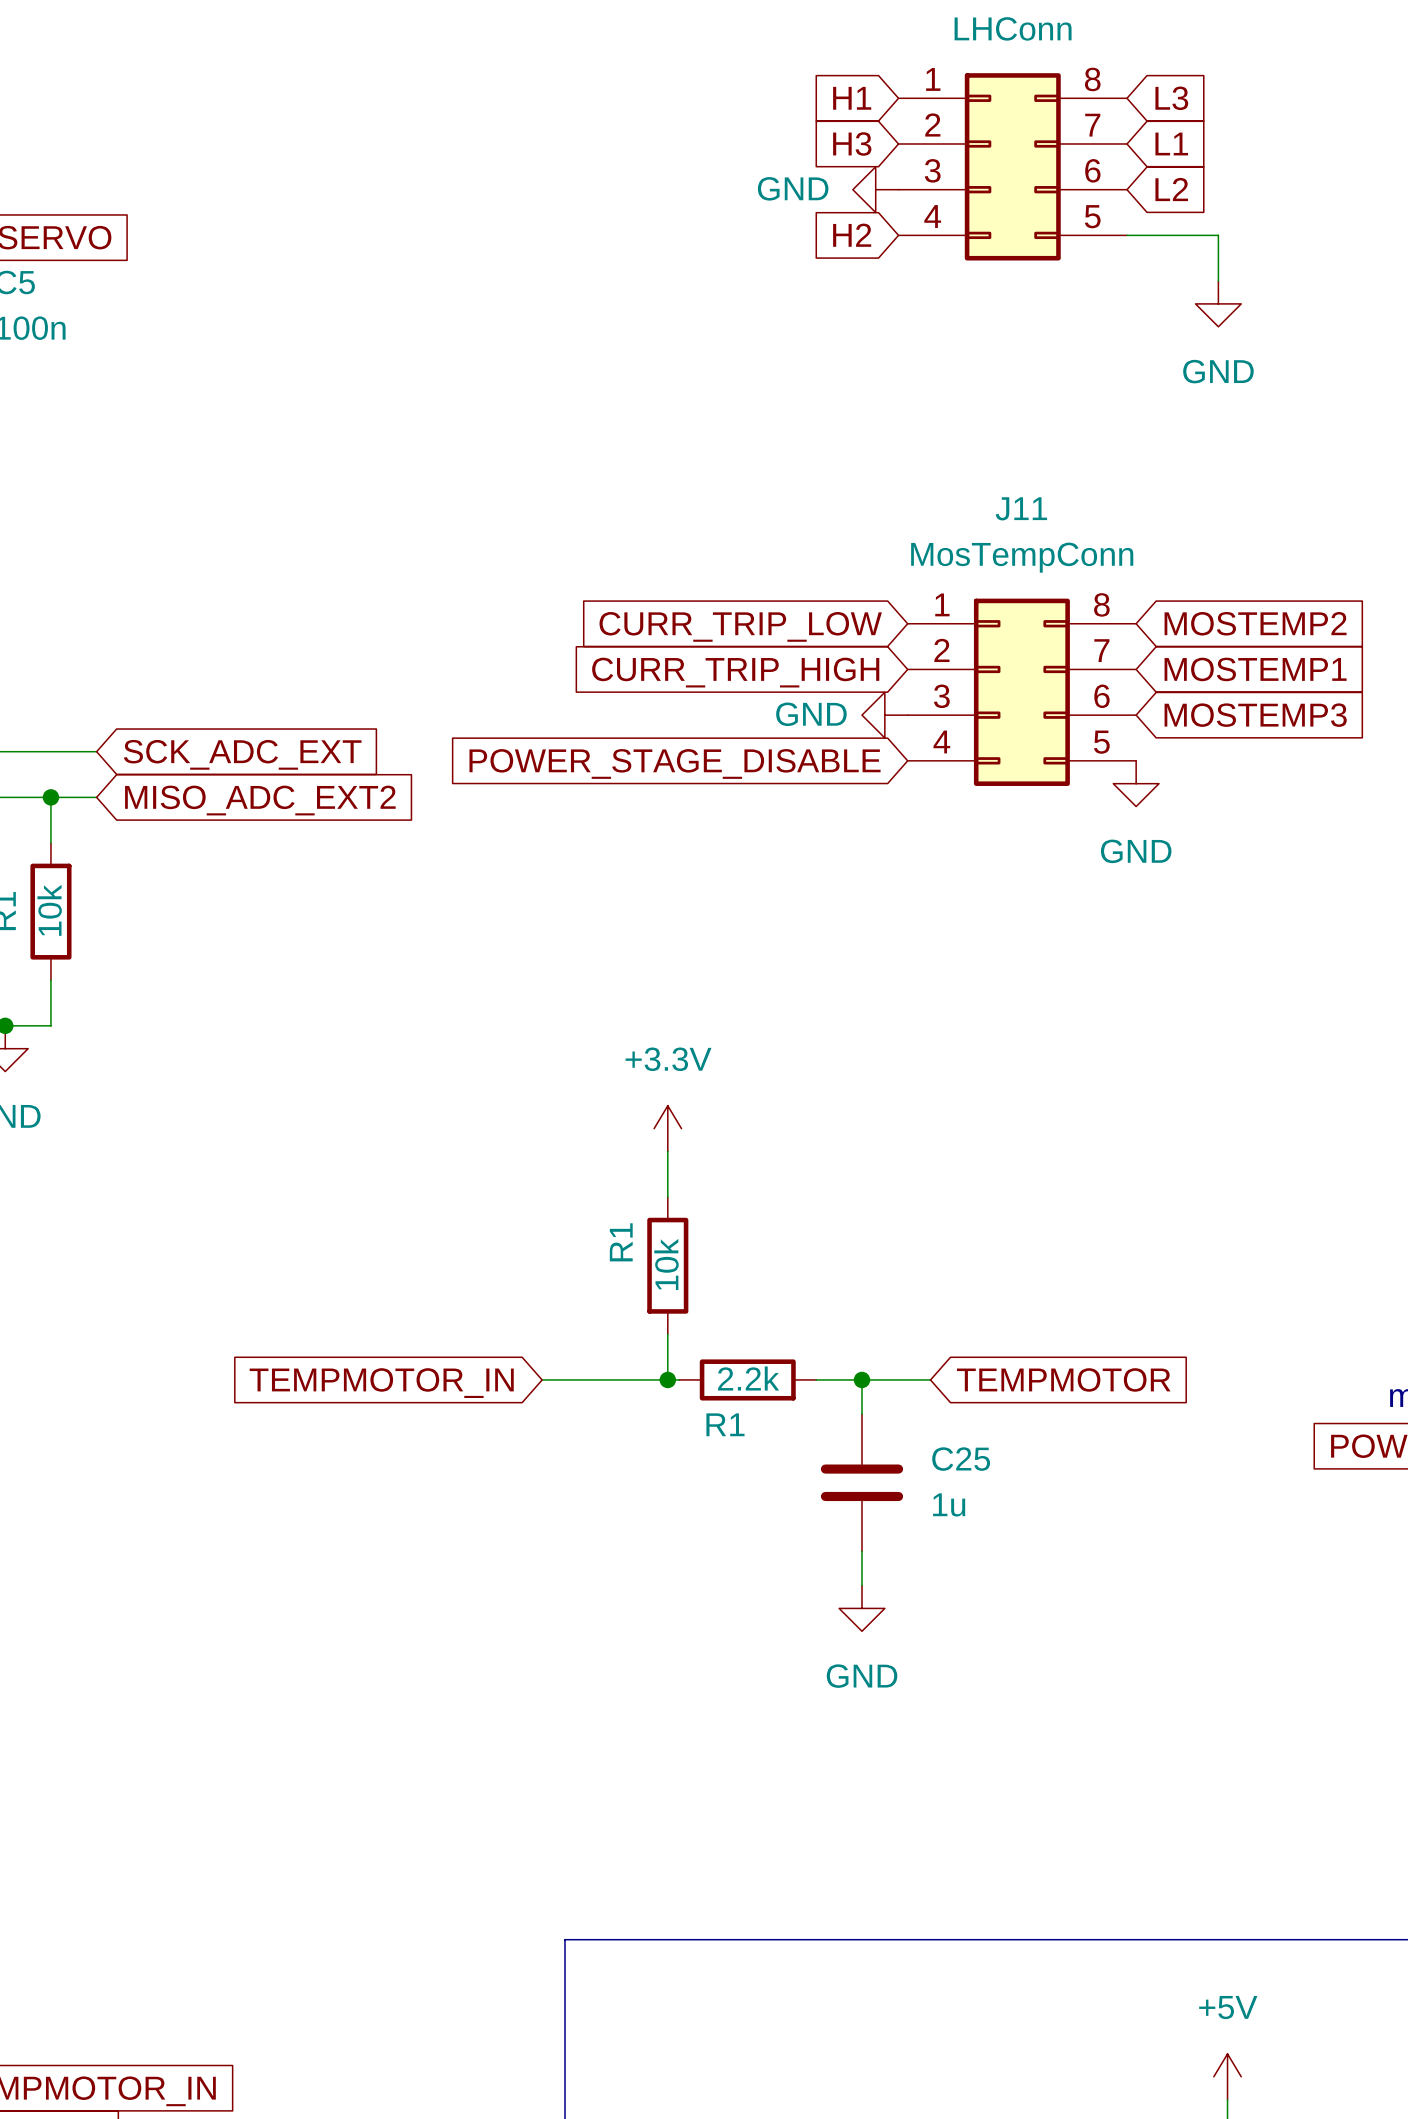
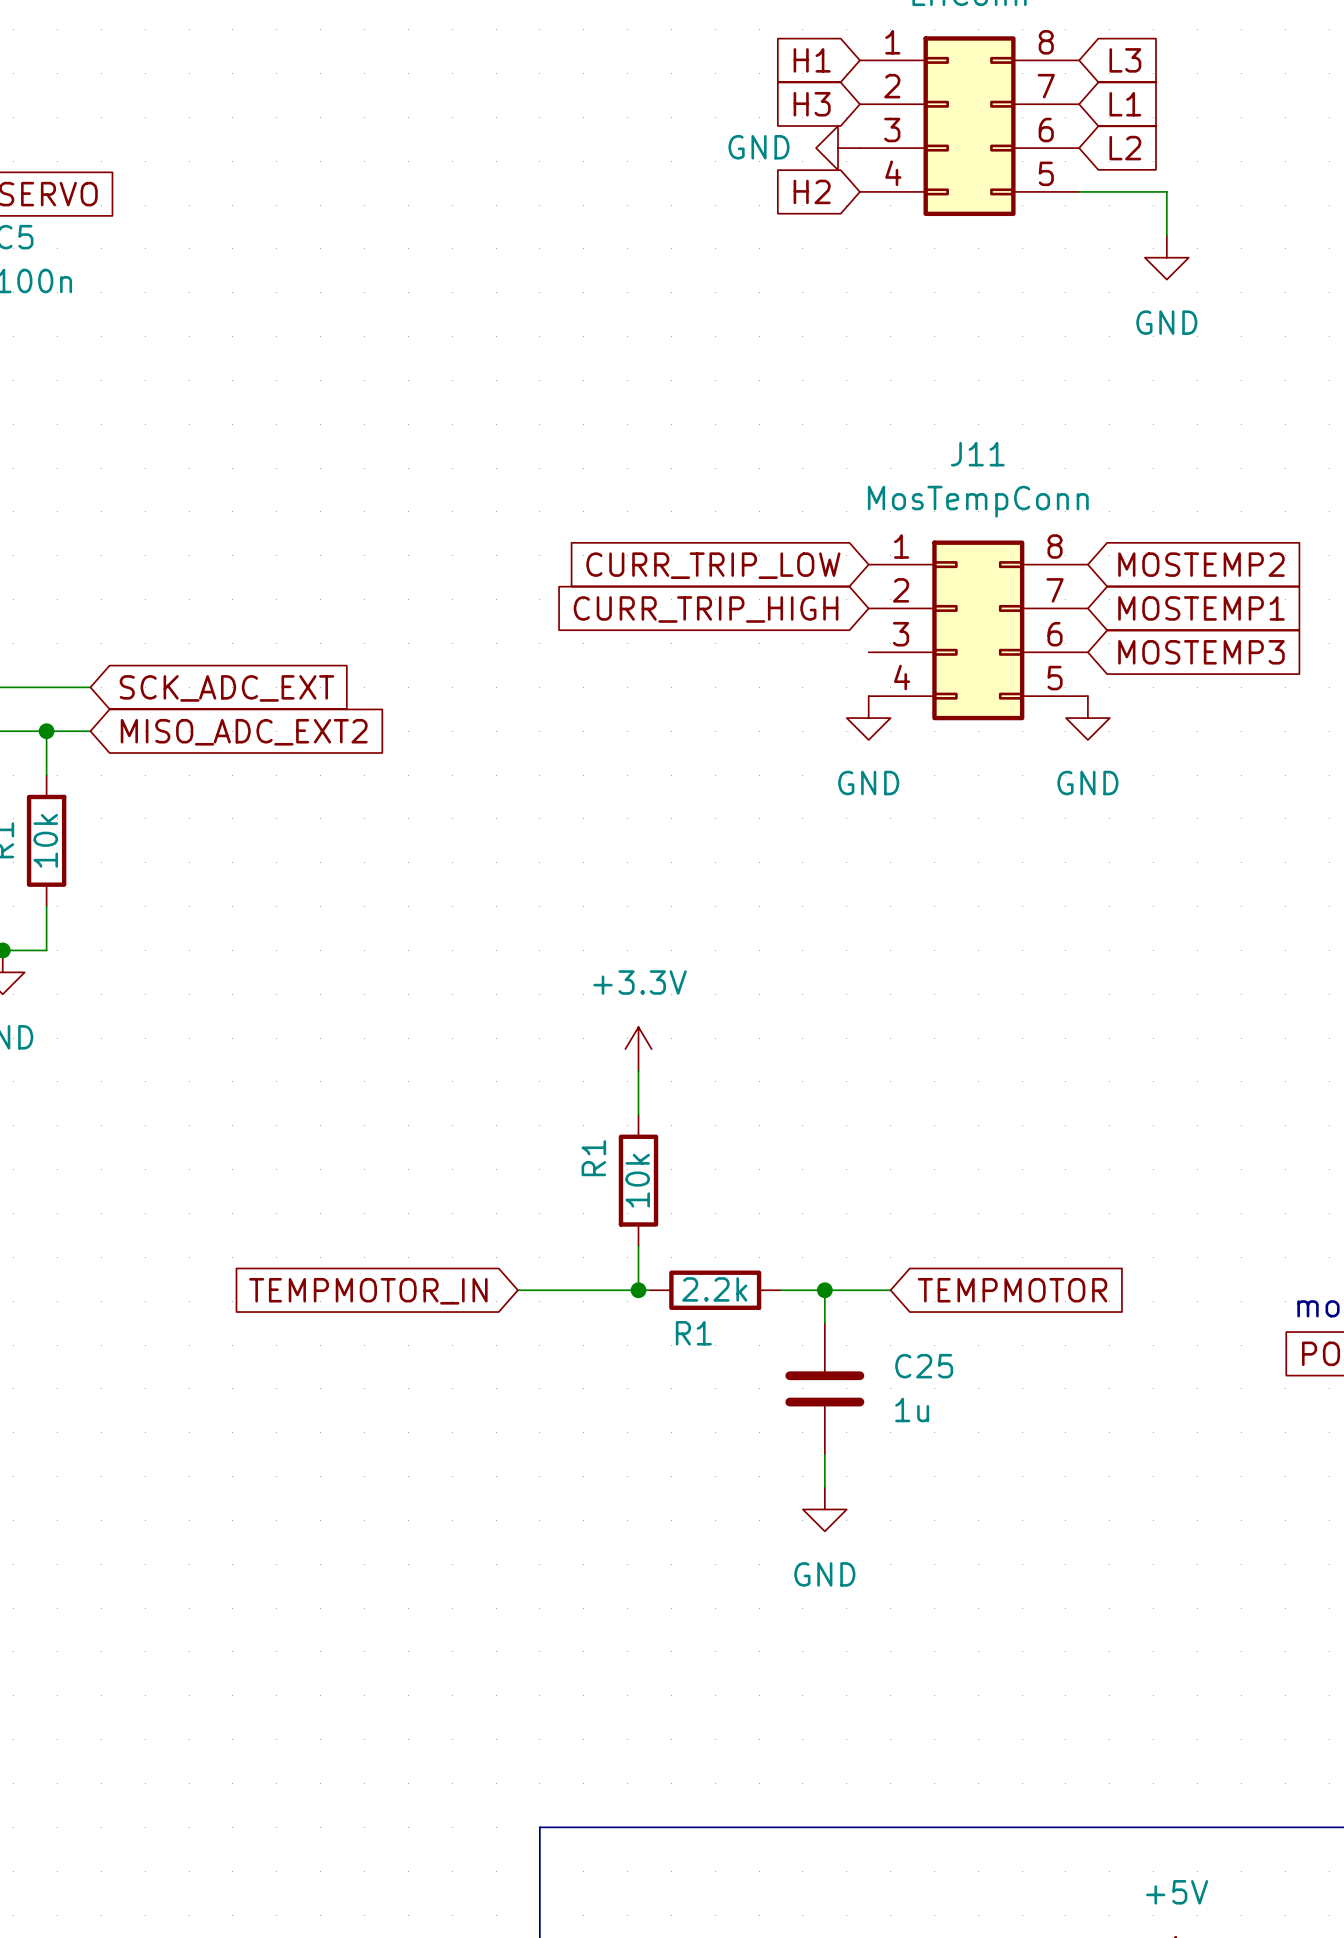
power symbol rotation: 0° (884, 715) -> 90° counterclockwise (868, 718)
power symbol position: GND (884, 715) -> GND (868, 718)
global label: POWER_STAGE_DISABLE (675, 763) -> none

